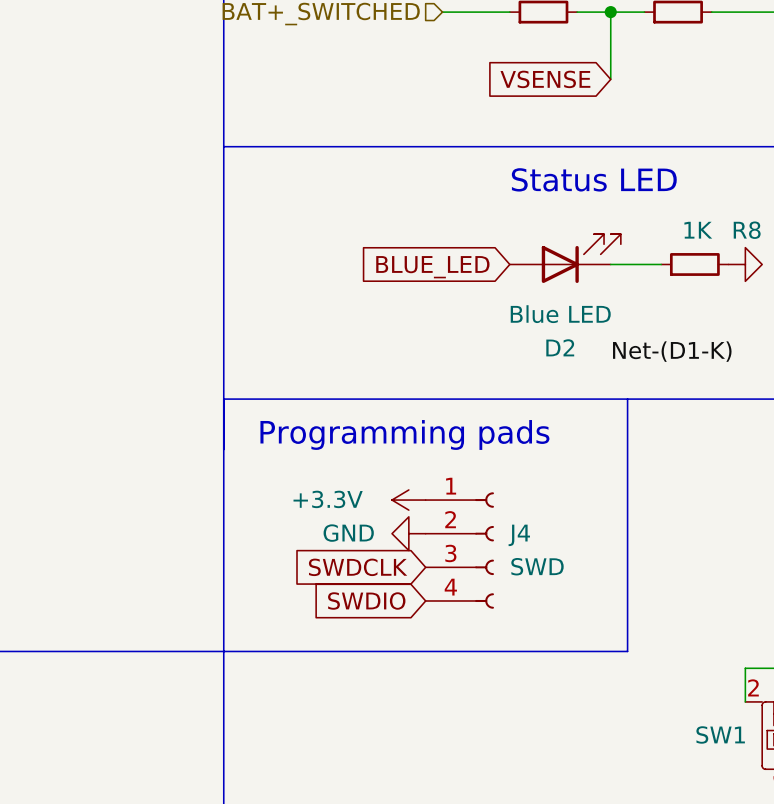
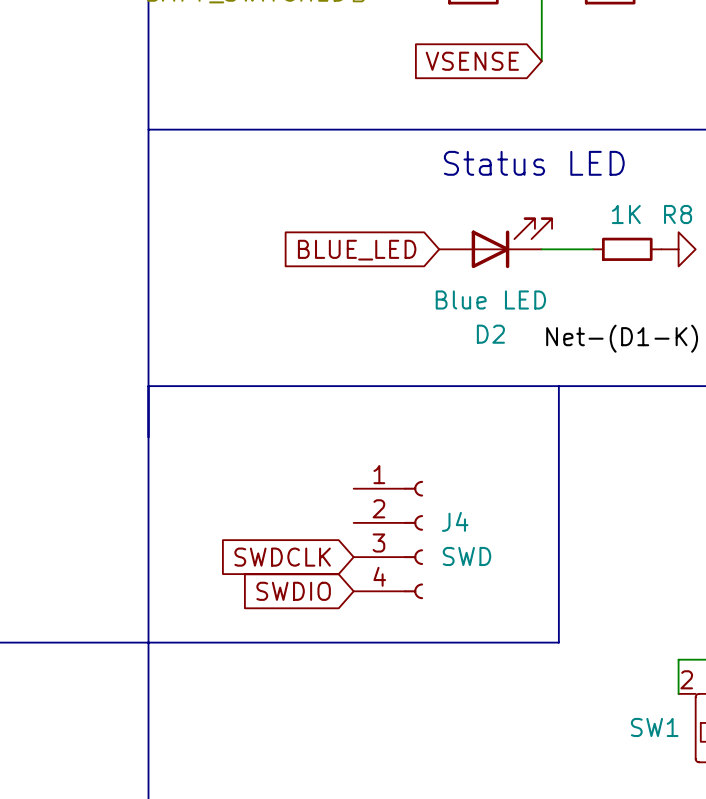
text: Programming pads (404, 434) -> none
power symbol: +3.3V (408, 500) -> none
power symbol: GND (408, 533) -> none

